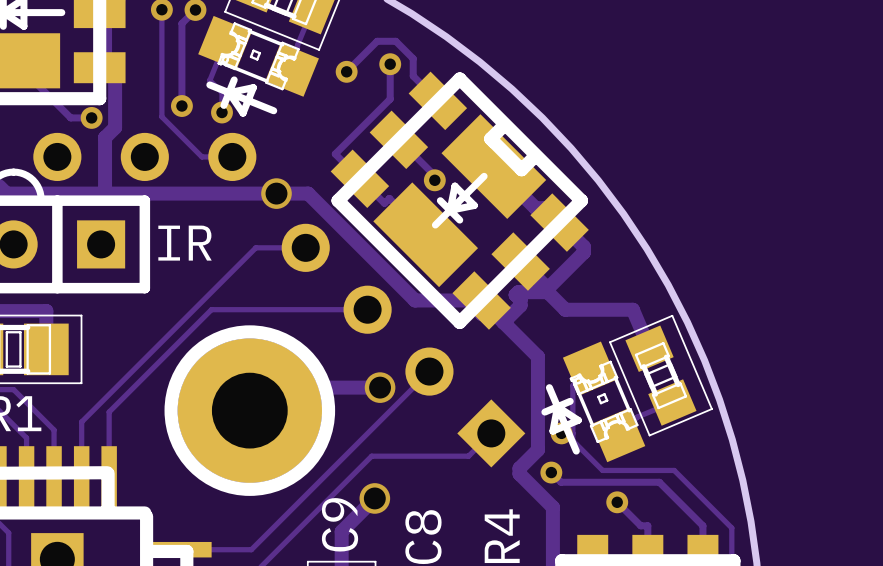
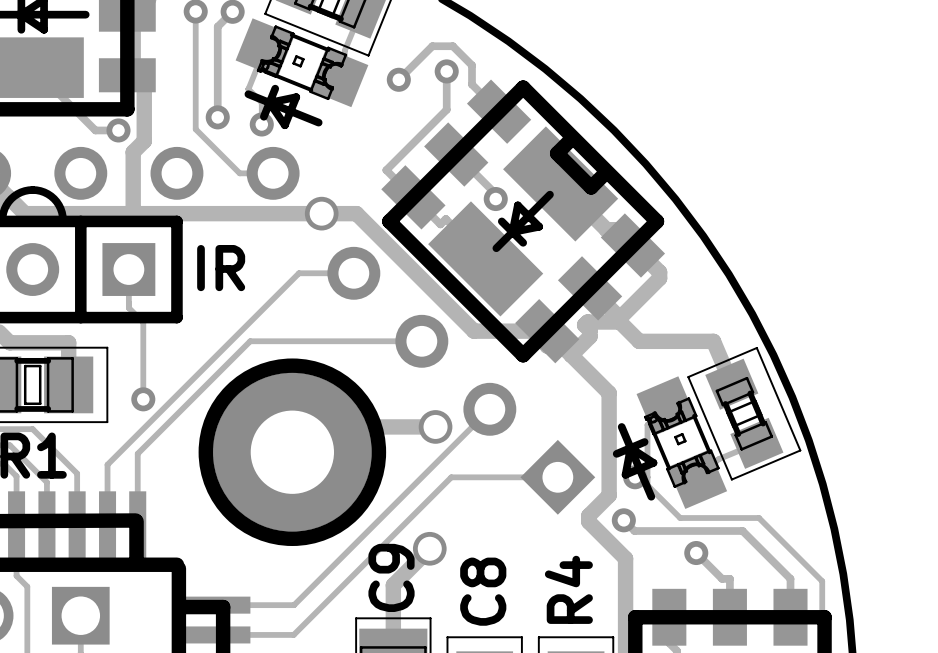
track: none -> (128, 269) (128, 307) (143, 322) (143, 399)
via: none -> (143, 399)
track: (491, 433) (468, 456) (371, 456) -> (557, 477) (451, 477) (426, 502)

